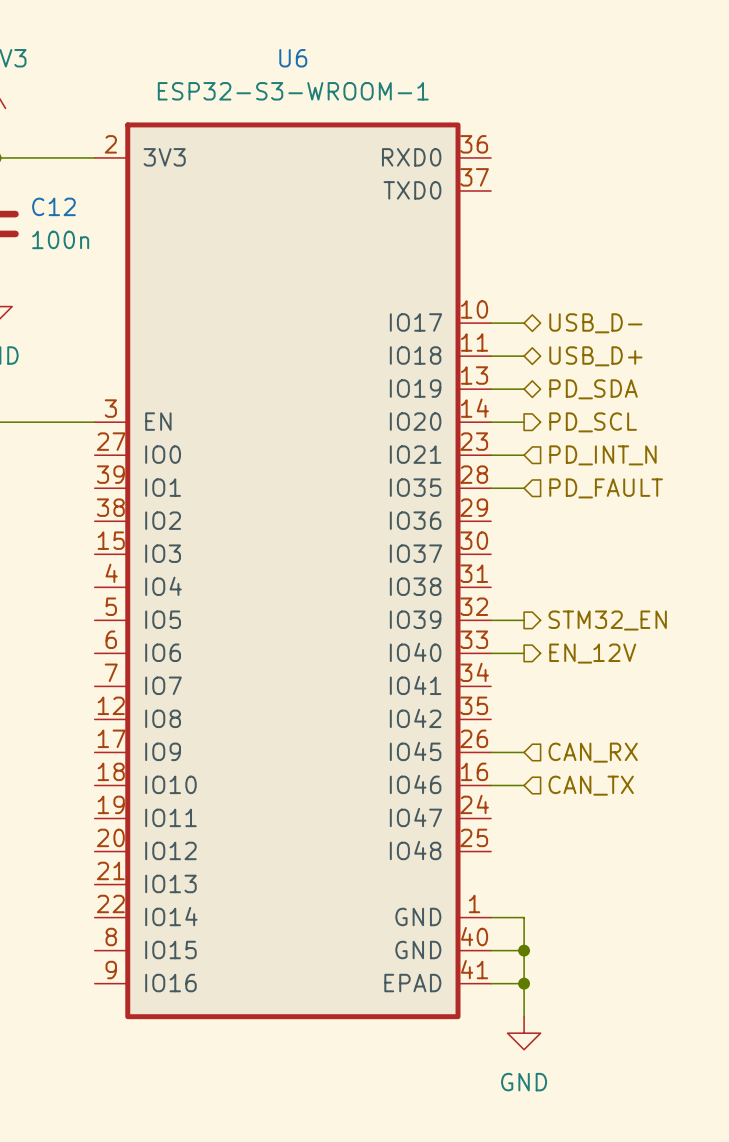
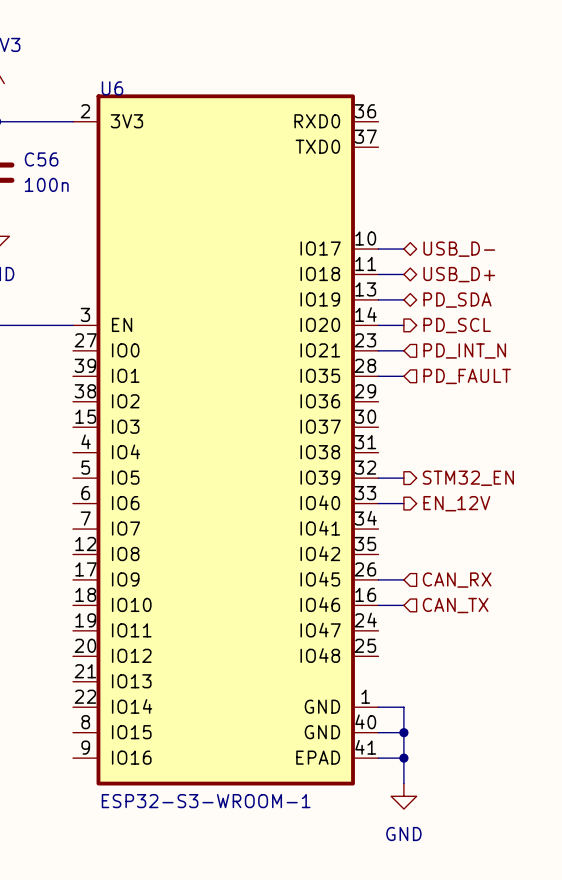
U6 name position: U6 (293, 58) -> U6 (112, 88)
U6 value position: ESP32-S3-WROOM-1 (293, 91) -> ESP32-S3-WROOM-1 (206, 801)
C12 name: C12 (53, 206) -> C56 (41, 159)

